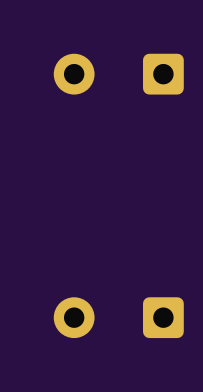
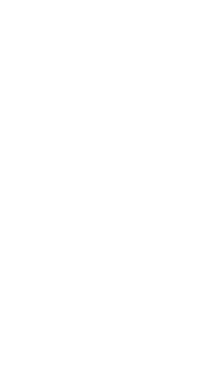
part: (118, 74) -> none
part: (118, 317) -> none

